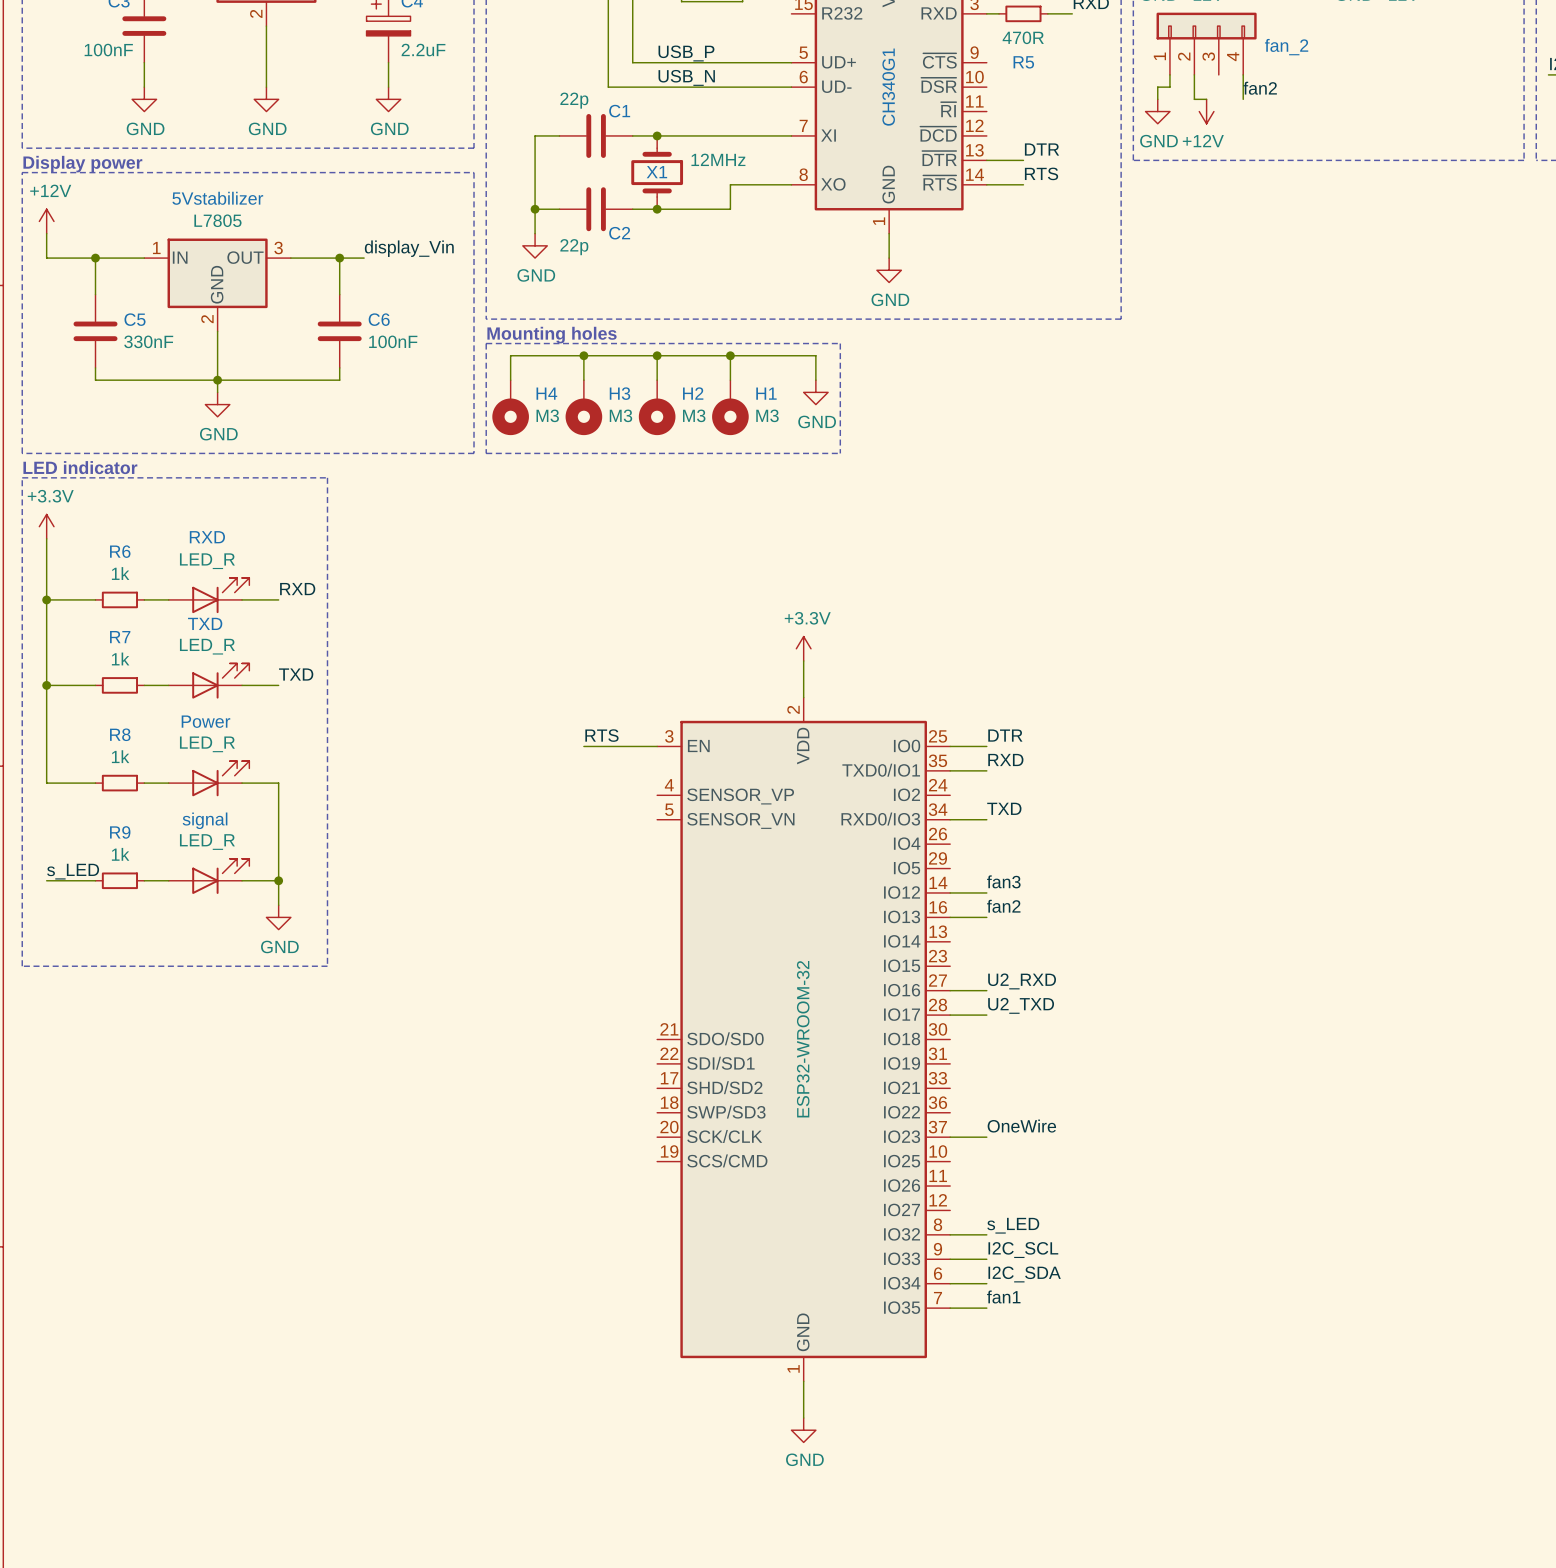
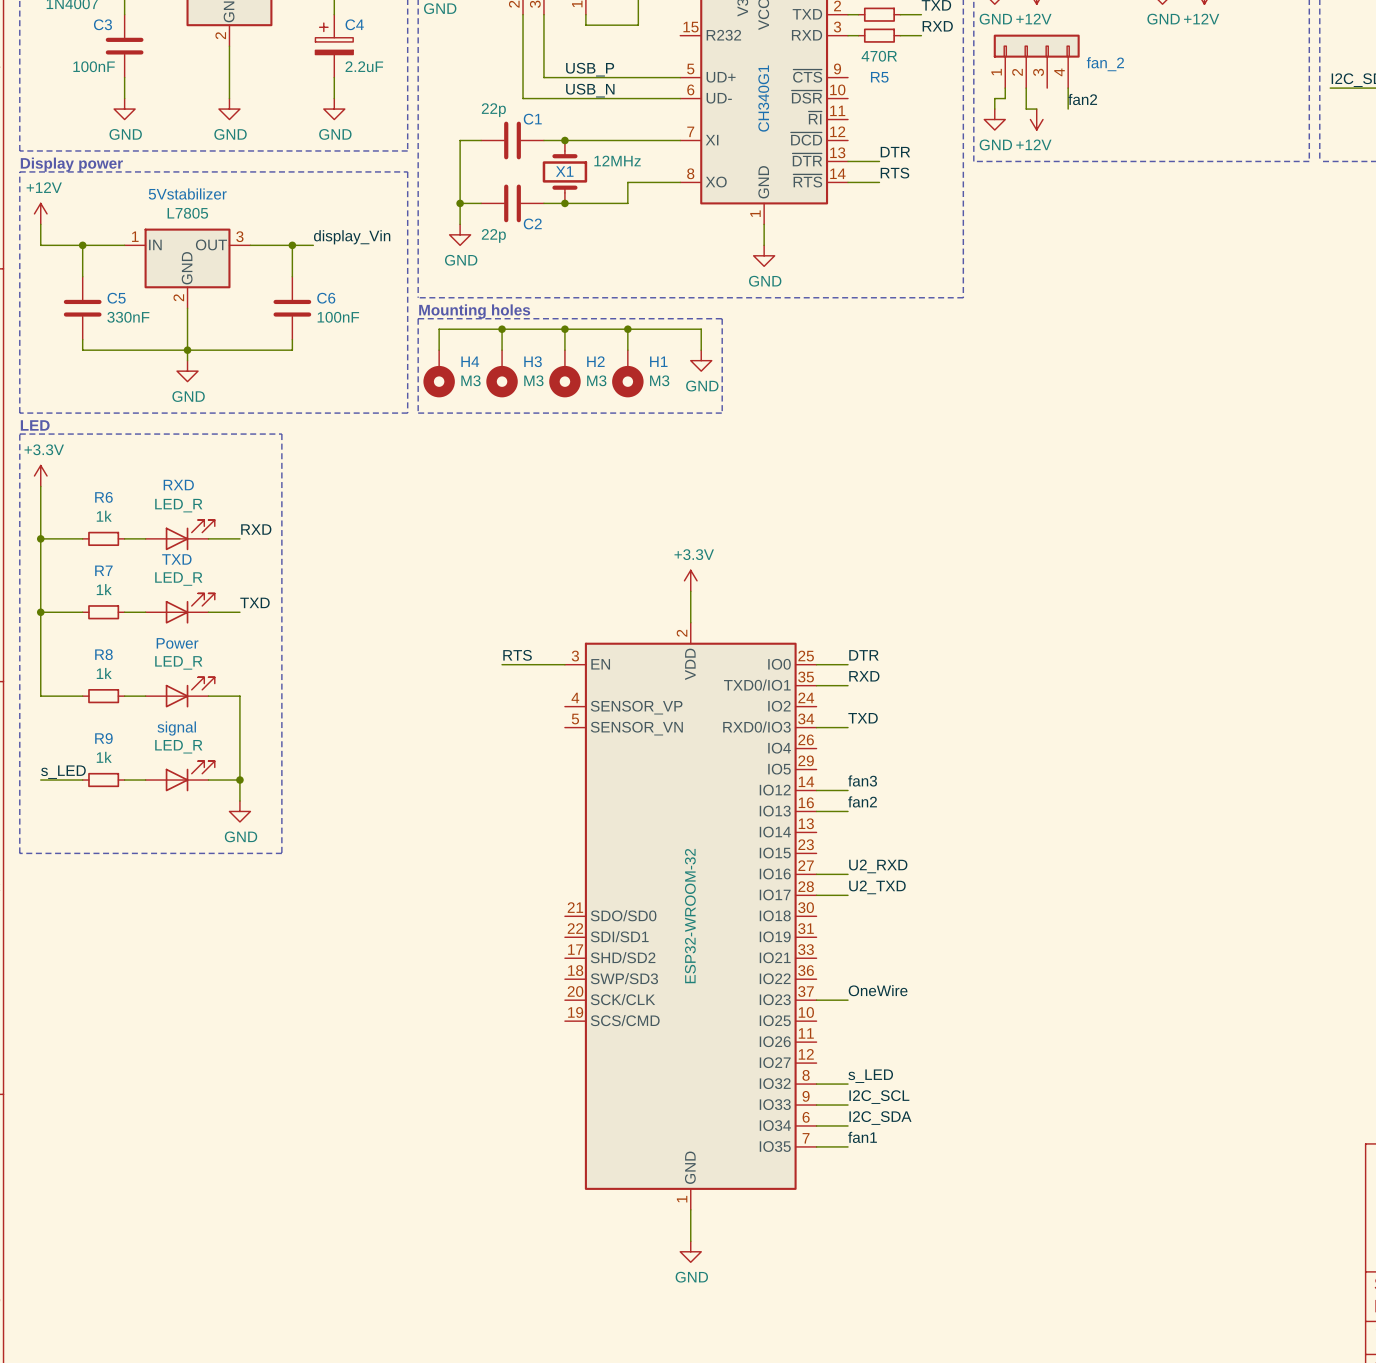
text: LED indicator (80, 467) -> LED (35, 425)

